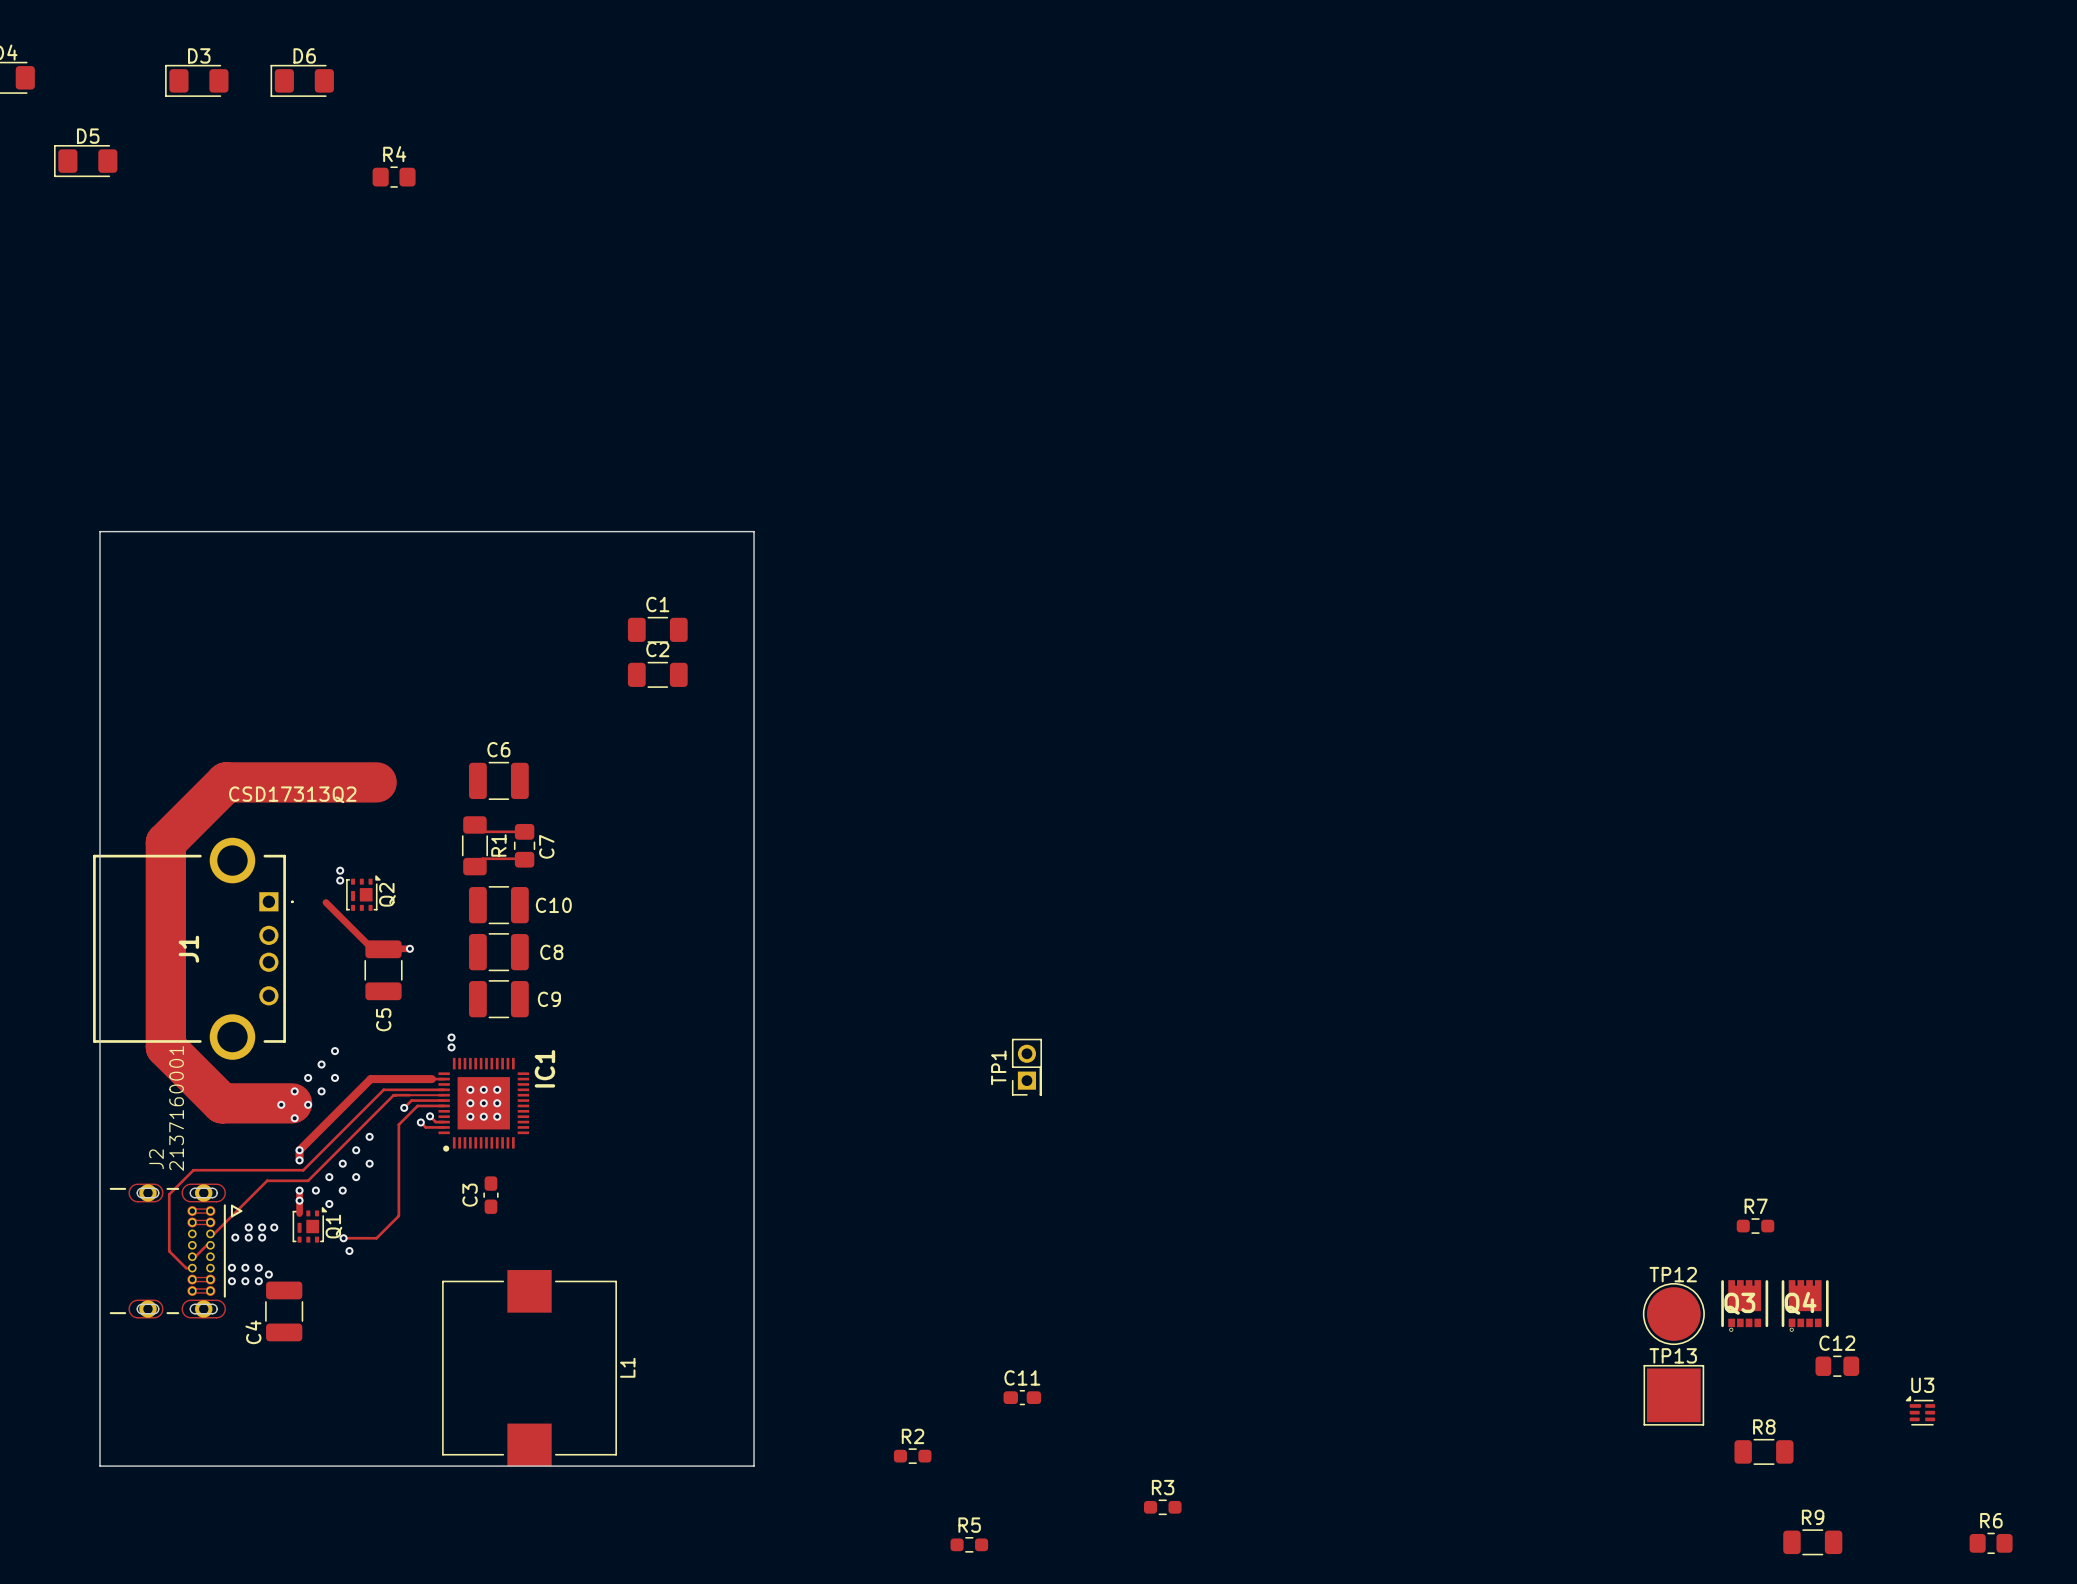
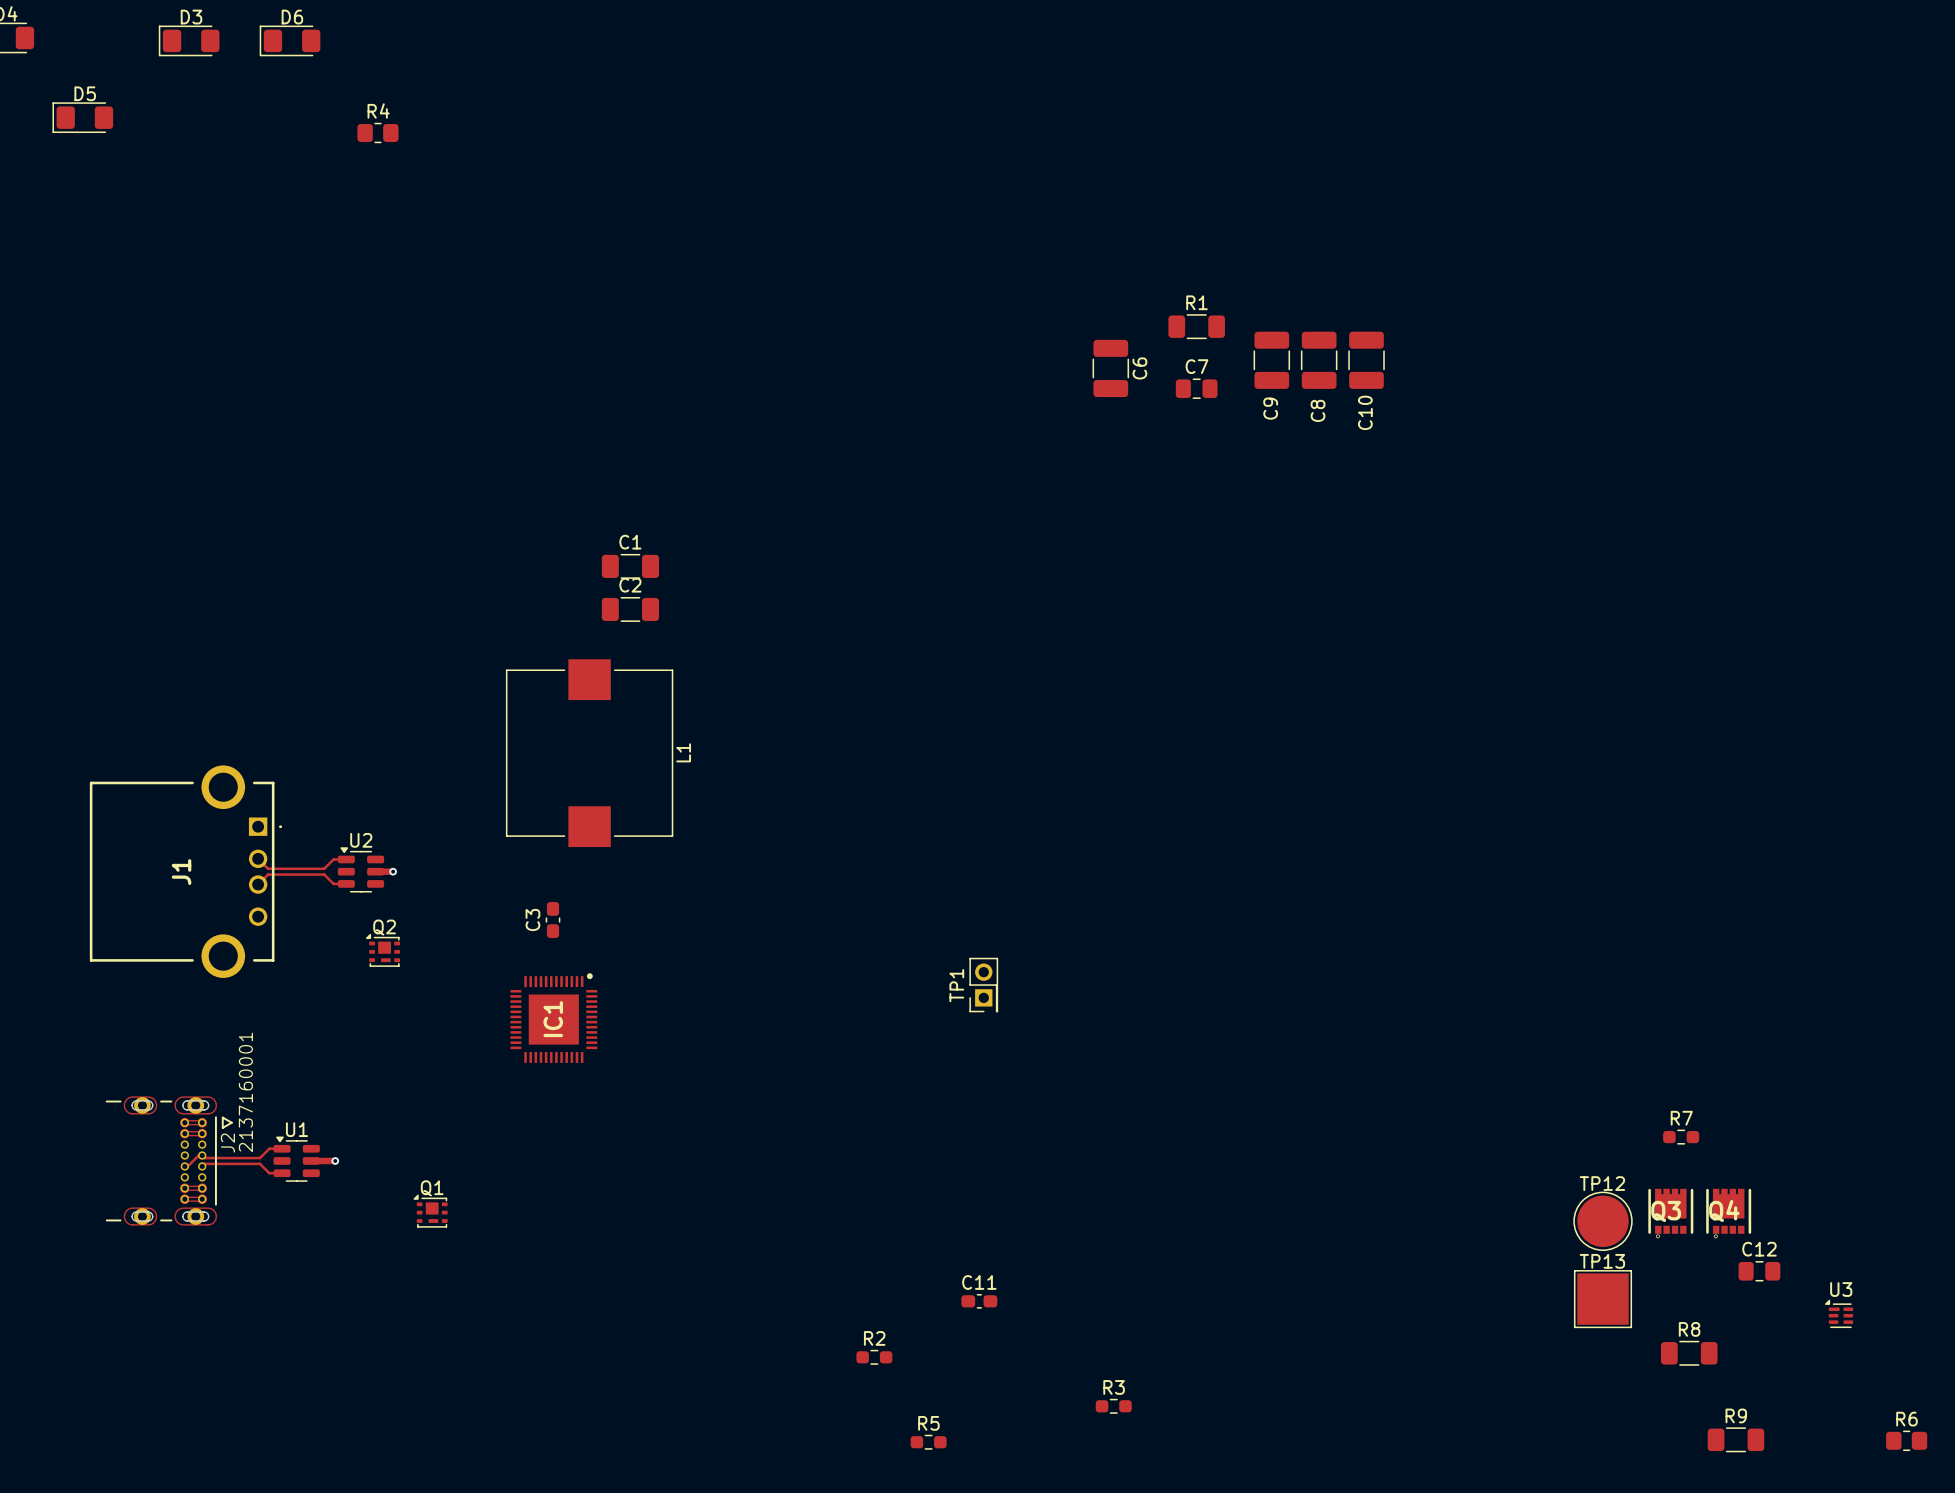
board edge: (100, 531) (754, 531) (754, 1466) (100, 1466) (100, 531) -> none
C6 rotation: 0° (498, 780) -> 90° clockwise (1110, 368)
C6 position: (498, 780) -> (1110, 368)
track: (376, 782) (226, 782) (165, 842) (165, 1047) (222, 1103) (292, 1103) -> none
Q2 value: CSD17313Q2 (292, 794) -> none
track: (474, 824) (481, 831) (524, 831) -> none
R1 rotation: 0° (474, 845) -> 90° clockwise (1196, 326)
R1 position: (474, 845) -> (1196, 326)
R1 name position: R1 (498, 845) -> R1 (1196, 302)
C7 rotation: 0° (524, 845) -> 90° clockwise (1196, 388)
C7 position: (524, 845) -> (1196, 388)
C7 name position: C7 (546, 846) -> C7 (1196, 366)
track: (524, 859) (482, 858) (474, 866) -> none
via: (340, 870) -> none
via: (340, 880) -> none
Q2 rotation: 0° (363, 893) -> 90° counterclockwise (382, 950)
Q2 position: (363, 893) -> (382, 950)
track: (325, 902) (372, 948) (391, 948) -> none
C10 rotation: 0° (498, 905) -> 90° clockwise (1366, 360)
C10 position: (498, 905) -> (1366, 360)
track: none -> (258, 858) (268, 868) (324, 868) (333, 859) (346, 859)
U2: none -> (360, 869)
C8 rotation: 0° (498, 952) -> 90° clockwise (1319, 360)
C8 position: (498, 952) -> (1319, 360)
track: none -> (346, 883) (333, 883) (324, 874) (268, 874) (258, 884)
C5: (383, 970) -> none
C9 rotation: 0° (498, 999) -> 90° clockwise (1271, 360)
C9 position: (498, 999) -> (1271, 360)
via: (451, 1037) -> none
via: (451, 1047) -> none
via: (335, 1051) -> none
via: (321, 1064) -> none
IC1 name position: IC1 (544, 1068) -> IC1 (553, 1019)
via: (308, 1077) -> none
via: (335, 1077) -> none
track: (444, 1079) (370, 1079) (299, 1150) (299, 1160) -> none
track: (444, 1089) (383, 1089) (303, 1170) (193, 1170) (169, 1194) (169, 1251) (186, 1268) (192, 1268) -> none
via: (470, 1089) -> none
via: (483, 1089) -> none
via: (497, 1089) -> none
via: (294, 1091) -> none
via: (321, 1091) -> none
track: (444, 1095) (393, 1095) (308, 1180) (267, 1180) (214, 1233) (210, 1233) -> none
track: (444, 1100) (411, 1100) (404, 1107) -> none
via: (470, 1103) -> none
via: (483, 1103) -> none
via: (497, 1103) -> none
via: (281, 1104) -> none
via: (308, 1104) -> none
IC1 rotation: 0° (483, 1104) -> 180° (553, 1018)
IC1 position: (483, 1104) -> (553, 1018)
track: (444, 1105) (417, 1105) (398, 1124) (398, 1215) (376, 1238) (343, 1238) -> none
via: (404, 1107) -> none
J2 value position: 2137160001 (176, 1108) -> 2137160001 (245, 1092)
track: (430, 1116) (435, 1122) (444, 1122) -> none
via: (430, 1116) -> none
via: (470, 1116) -> none
via: (483, 1116) -> none
via: (497, 1116) -> none
via: (294, 1118) -> none
track: (420, 1122) (425, 1127) (444, 1127) -> none
via: (420, 1122) -> none
via: (369, 1136) -> none
via: (299, 1150) -> none
via: (356, 1150) -> none
J2 name position: J2 (156, 1159) -> J2 (227, 1143)
via: (299, 1160) -> none
via: (342, 1163) -> none
via: (369, 1163) -> none
via: (329, 1177) -> none
via: (356, 1177) -> none
track: (299, 1190) (299, 1213) -> none
via: (299, 1190) -> none
via: (315, 1190) -> none
via: (342, 1190) -> none
C3 position: (490, 1195) -> (553, 920)
via: (299, 1200) -> none
via: (329, 1204) -> none
Q1 rotation: 0° (309, 1224) -> 90° counterclockwise (430, 1211)
Q1 position: (309, 1224) -> (430, 1211)
via: (248, 1227) -> none
via: (262, 1227) -> none
via: (274, 1227) -> none
via: (235, 1237) -> none
via: (248, 1237) -> none
via: (262, 1237) -> none
track: none -> (282, 1148) (269, 1148) (259, 1158) (204, 1158) (202, 1155)
via: (343, 1238) -> none
U1: none -> (296, 1159)
track: none -> (311, 1160) (335, 1160)
track: none -> (202, 1166) (204, 1163) (259, 1163) (269, 1173) (282, 1173)
via: (231, 1267) -> none
via: (245, 1267) -> none
via: (258, 1267) -> none
via: (268, 1274) -> none
via: (231, 1281) -> none
via: (245, 1281) -> none
via: (258, 1281) -> none
C4: (284, 1311) -> none
L1 position: (529, 1368) -> (589, 753)

